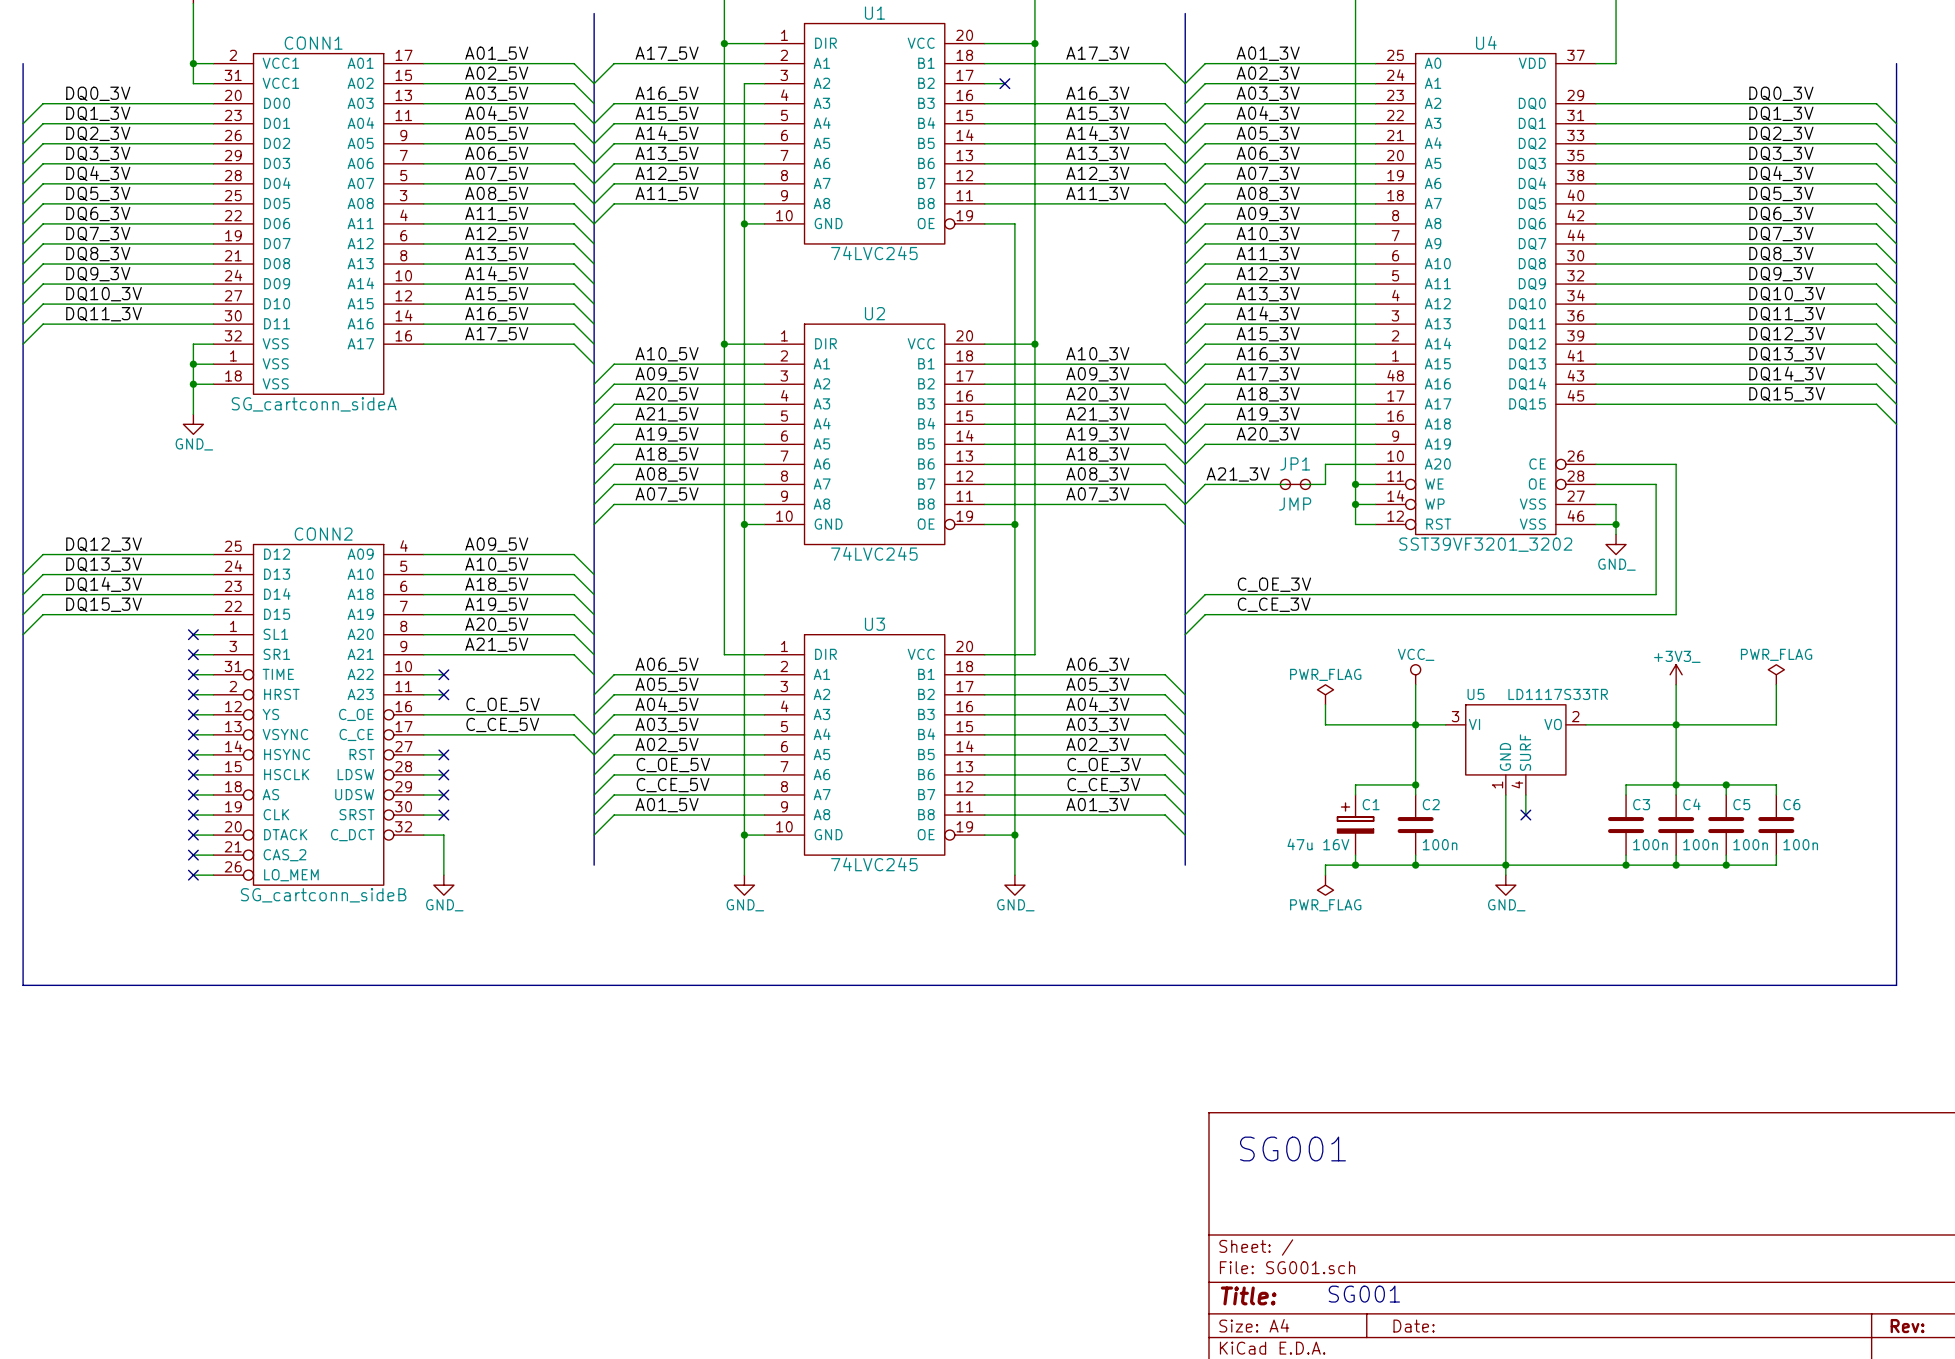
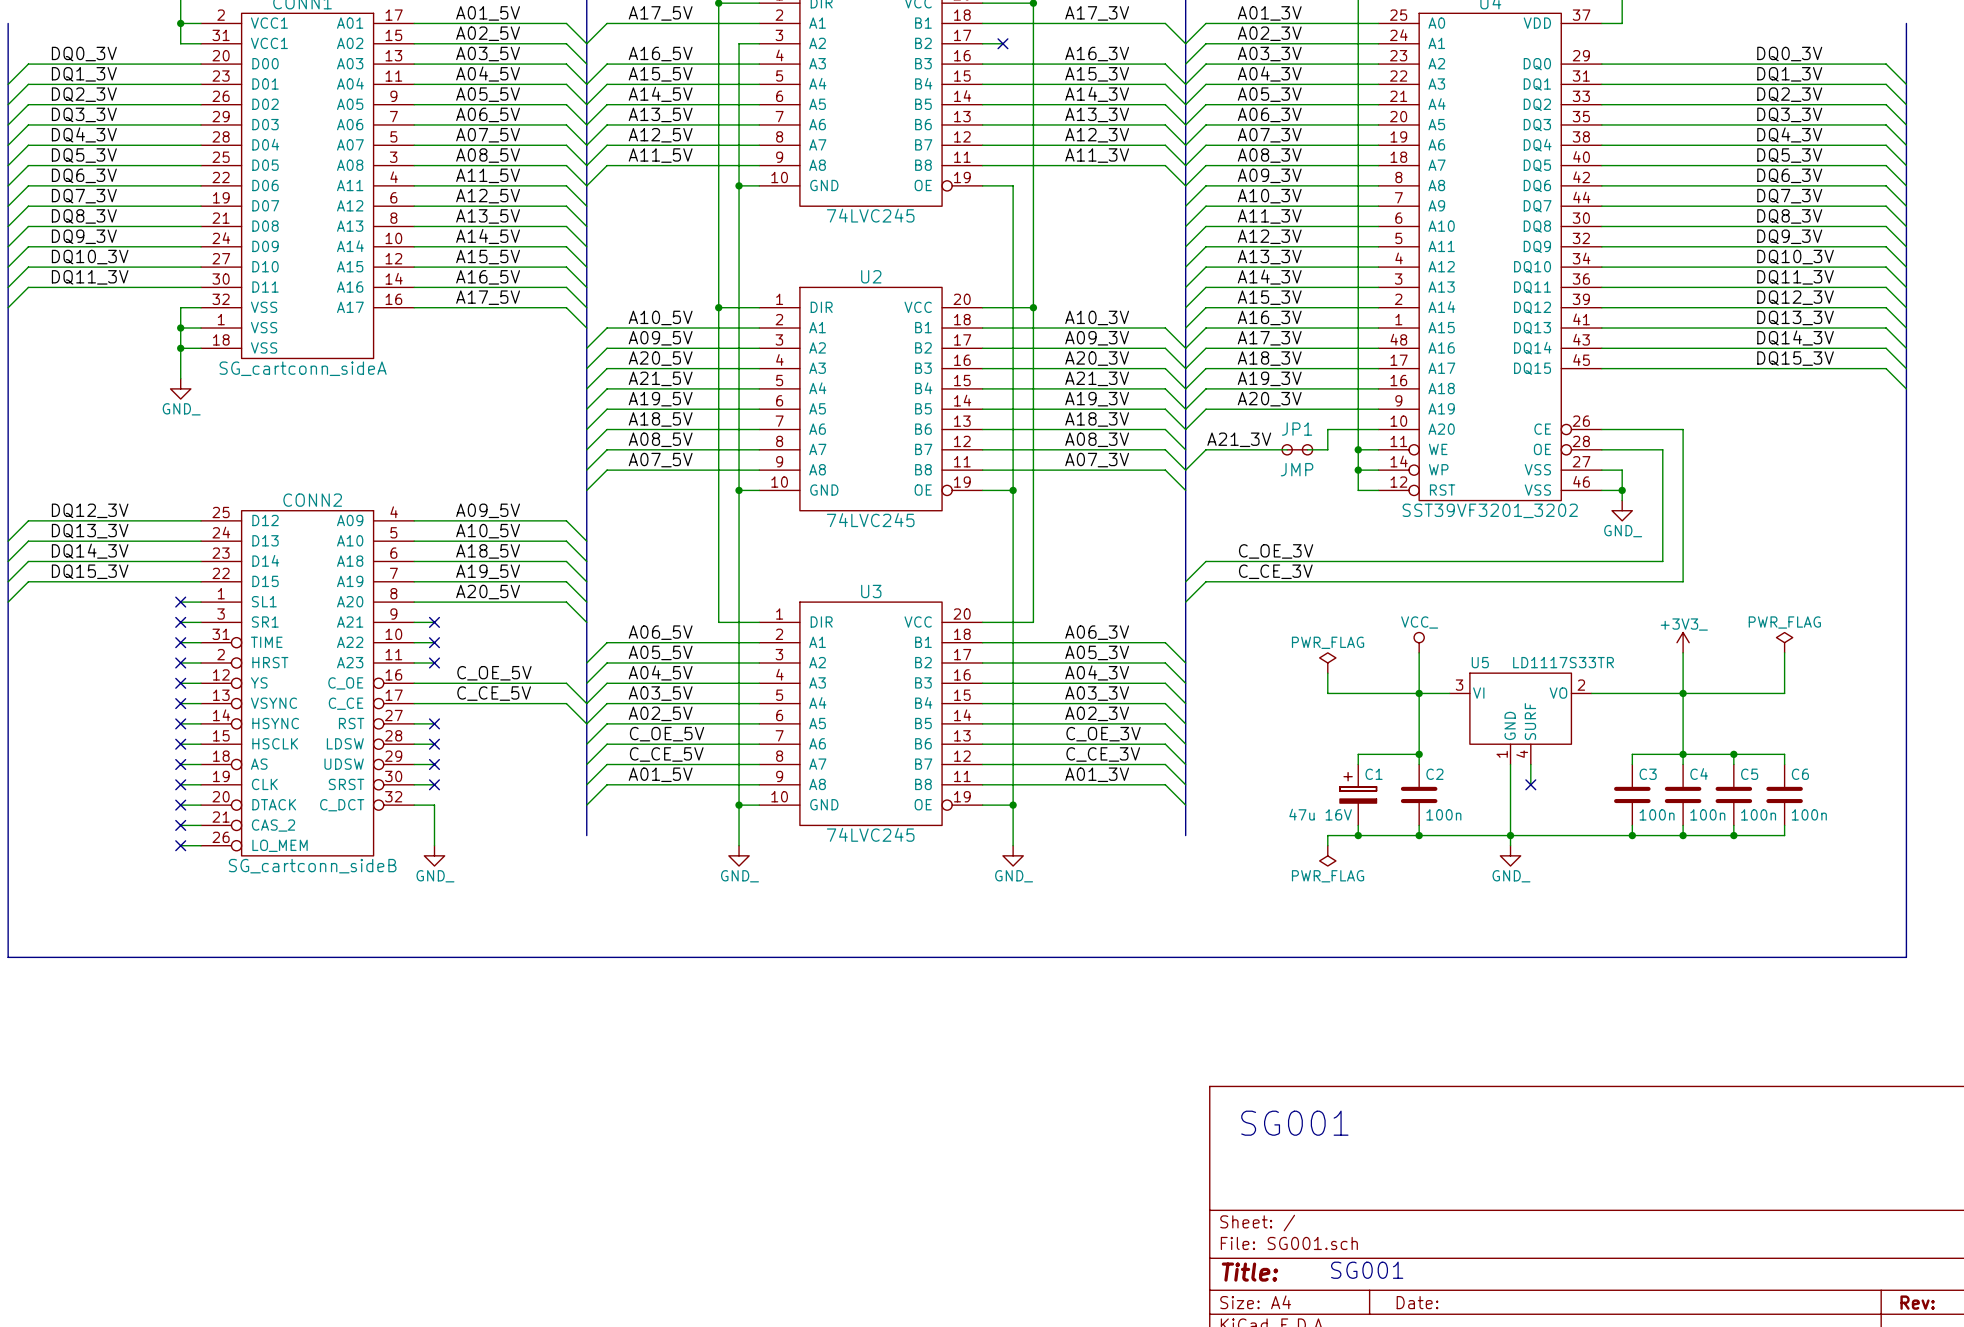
label: A21_5V (496, 644) -> none
wire: (443, 654) (574, 654) (594, 674) -> none
no-connect mark: none -> (434, 622)

